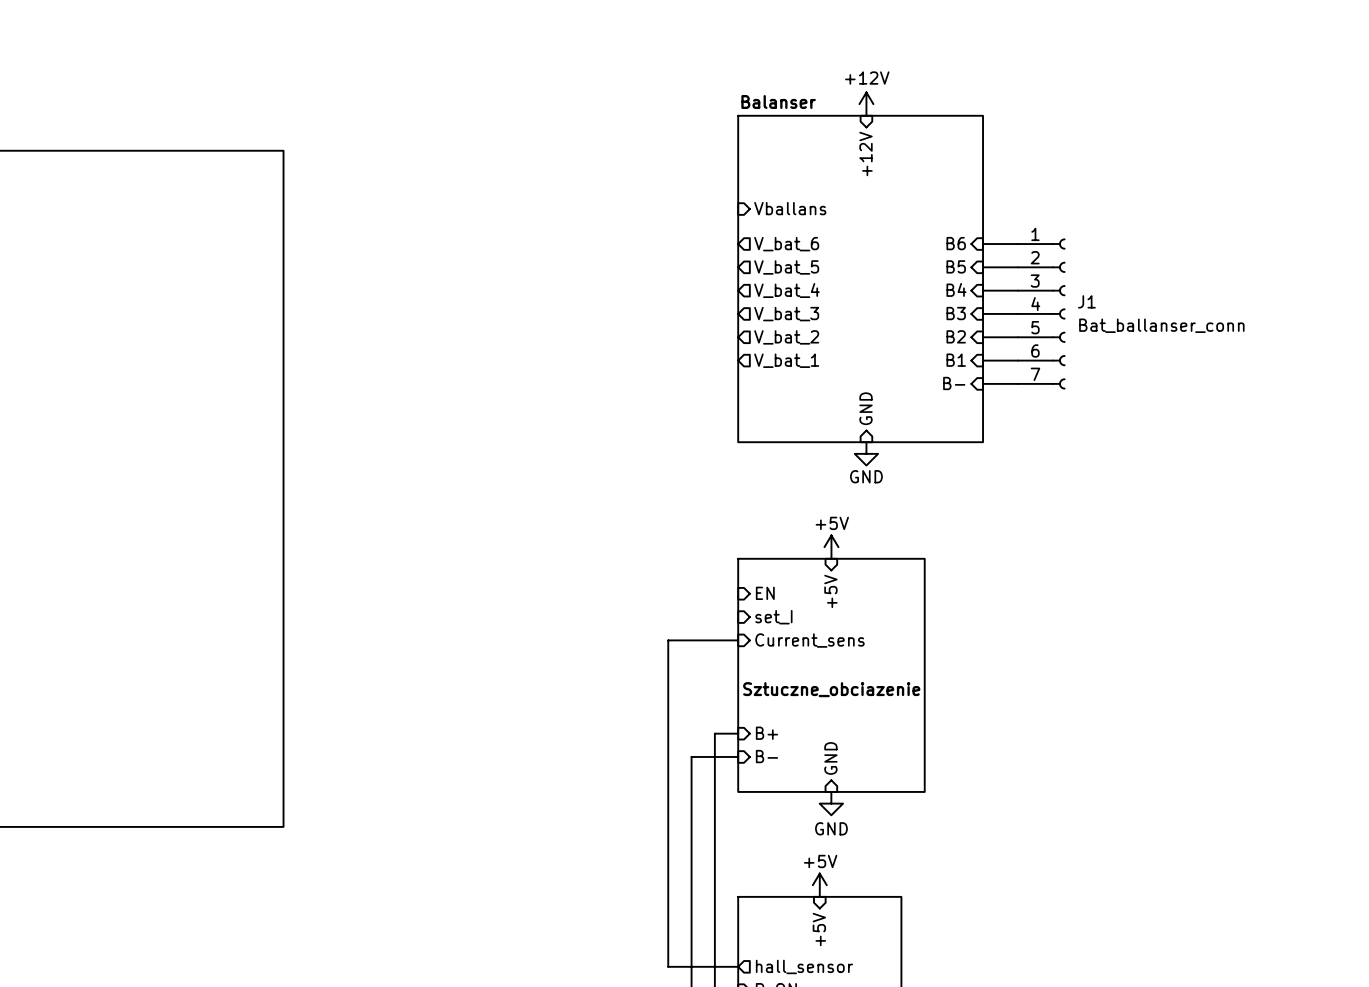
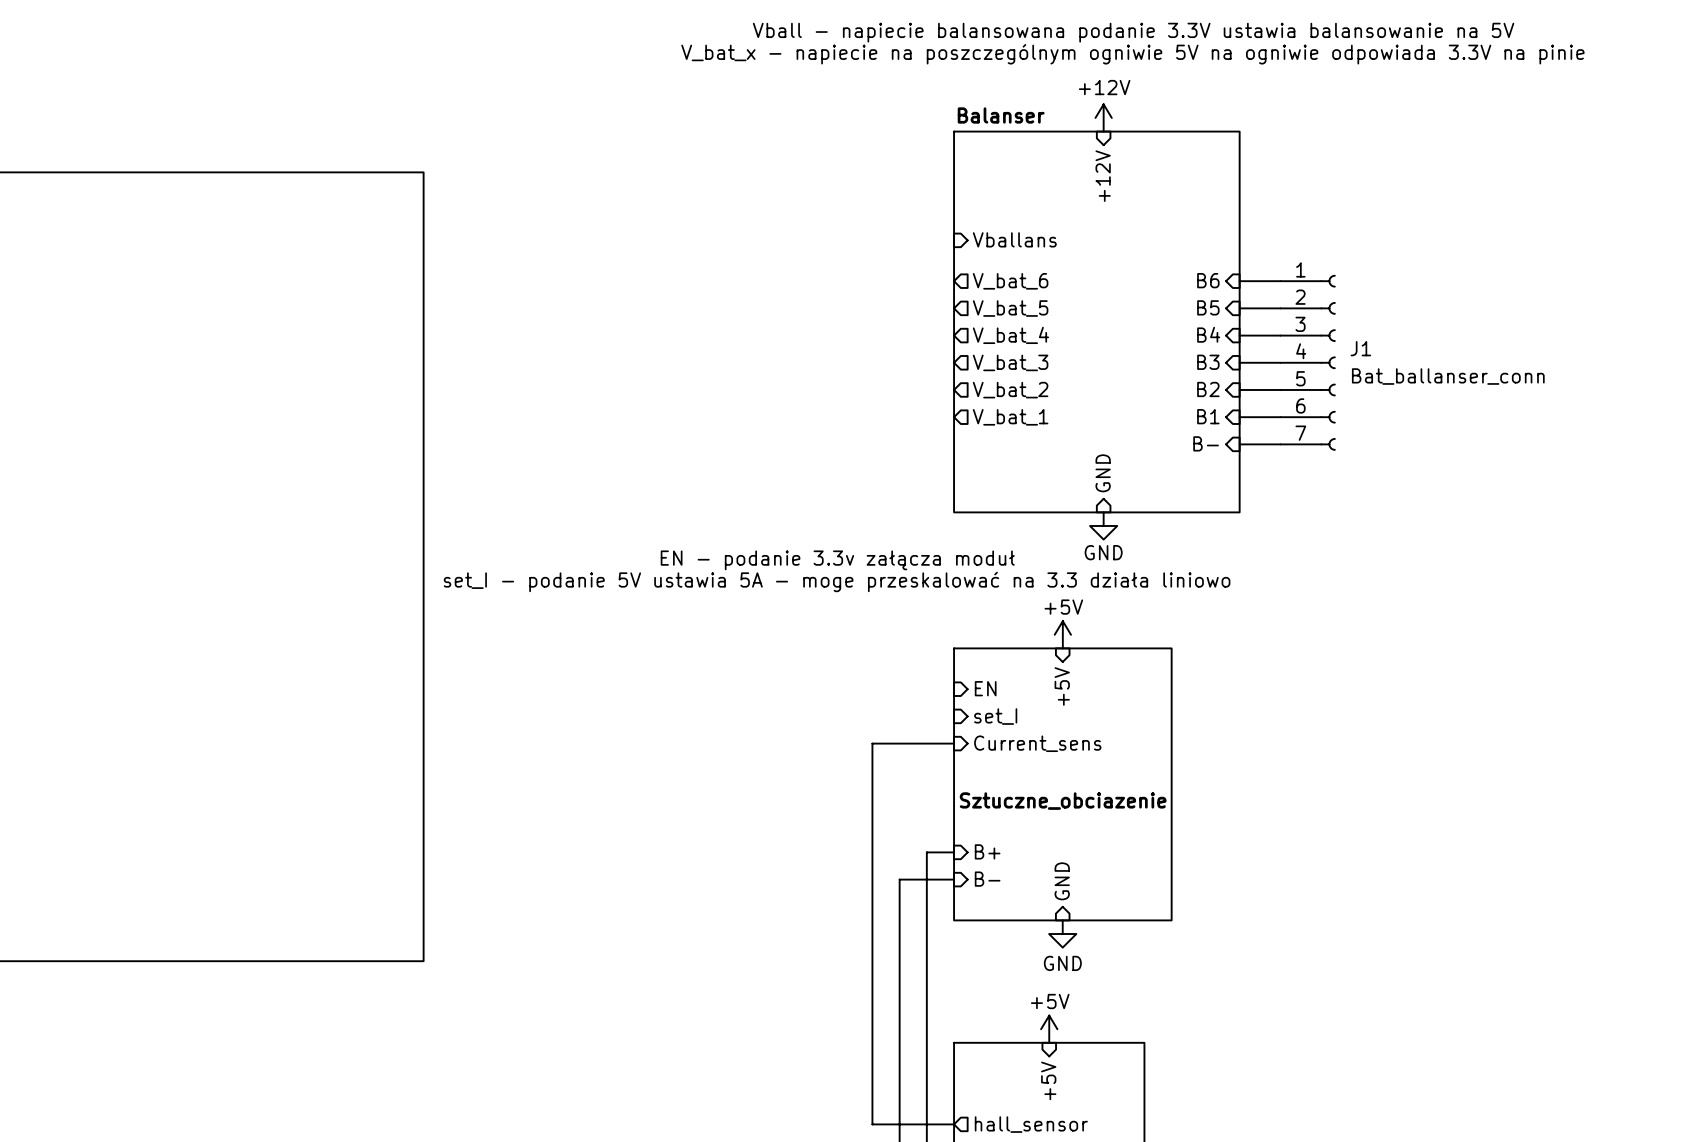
text: none -> Vball - napiecie balansowana podanie 3.3V ustawia balansowanie na 5V (1133, 32)
text: none -> V_bat_x - napiecie na poszczególnym ogniwie 5V na ogniwie odpowiada 3.3V na pinie (1132, 54)
text: none -> EN - podanie 3.3v załącza moduł (837, 560)
text: none -> set_I - podanie 5V ustawia 5A - moge przeskalować na 3.3 działa liniowo (837, 581)

